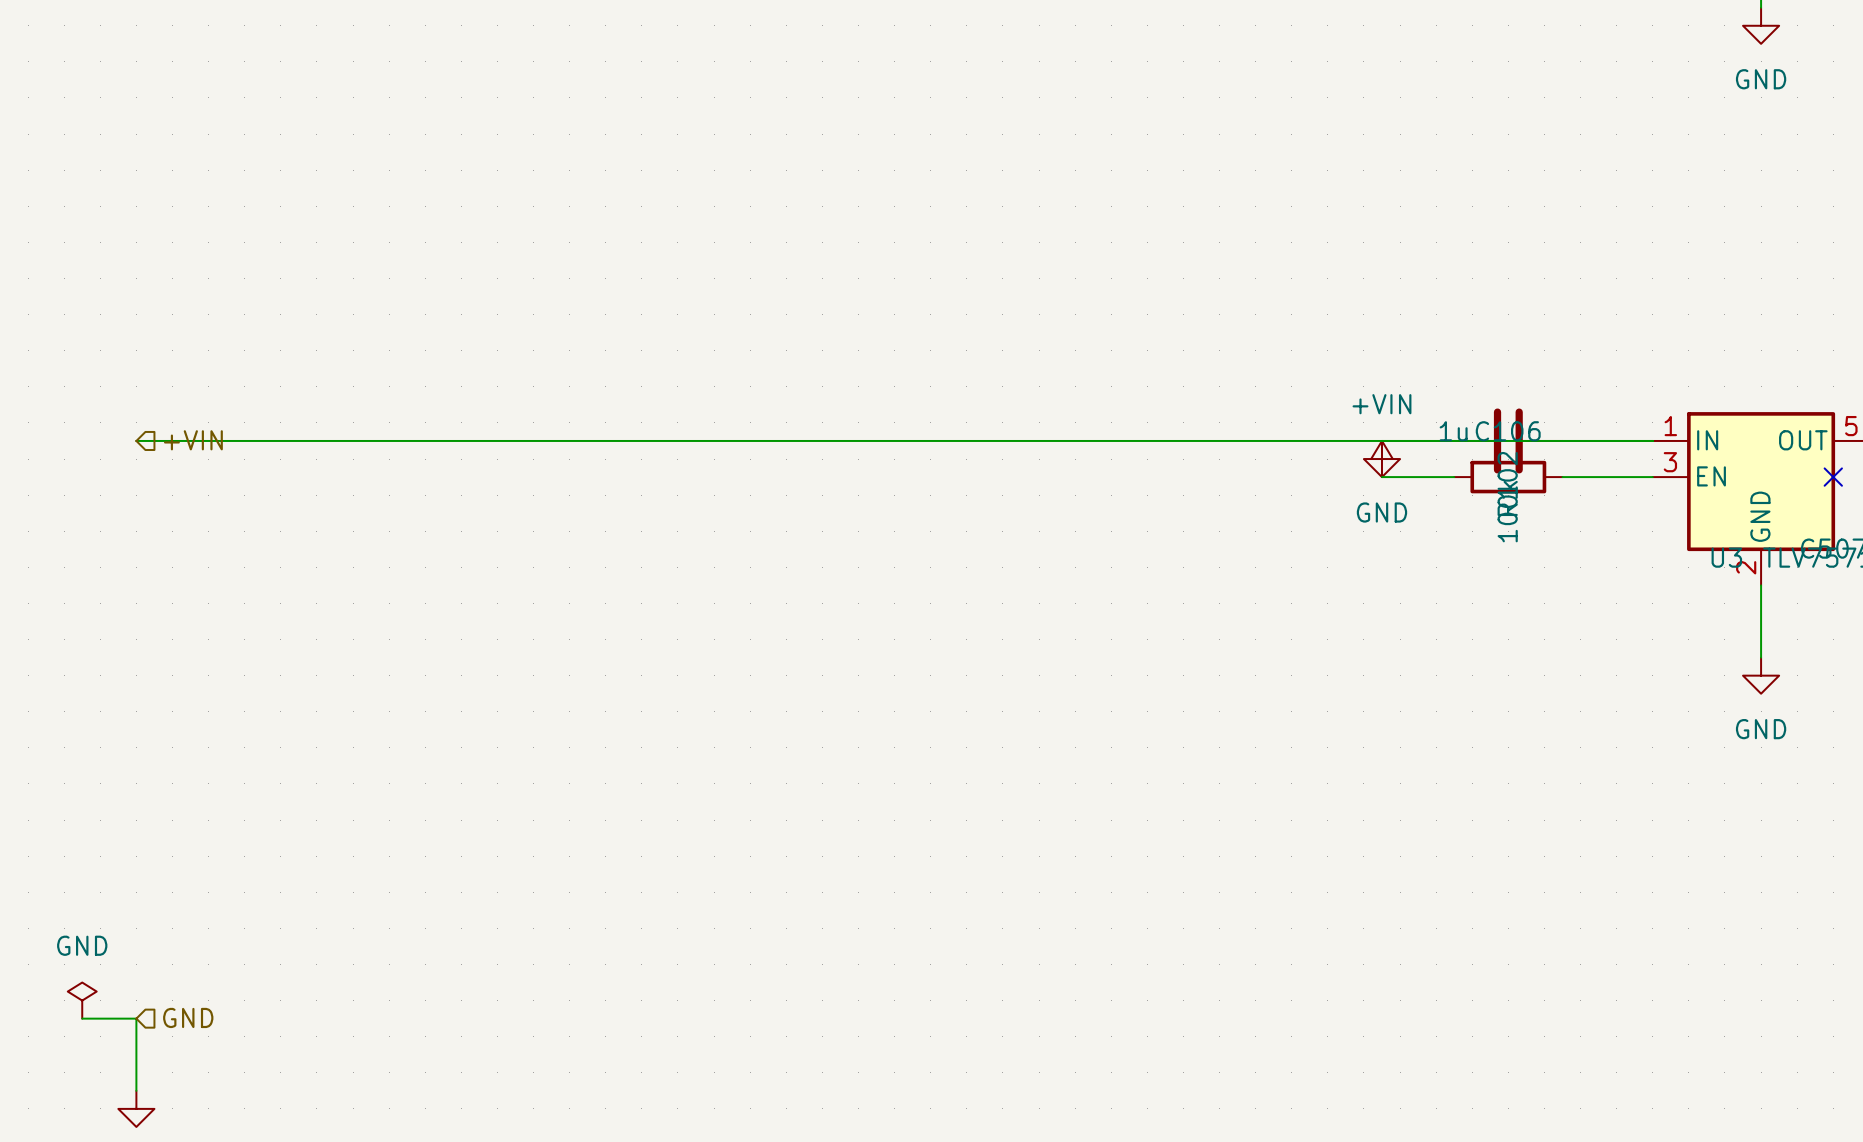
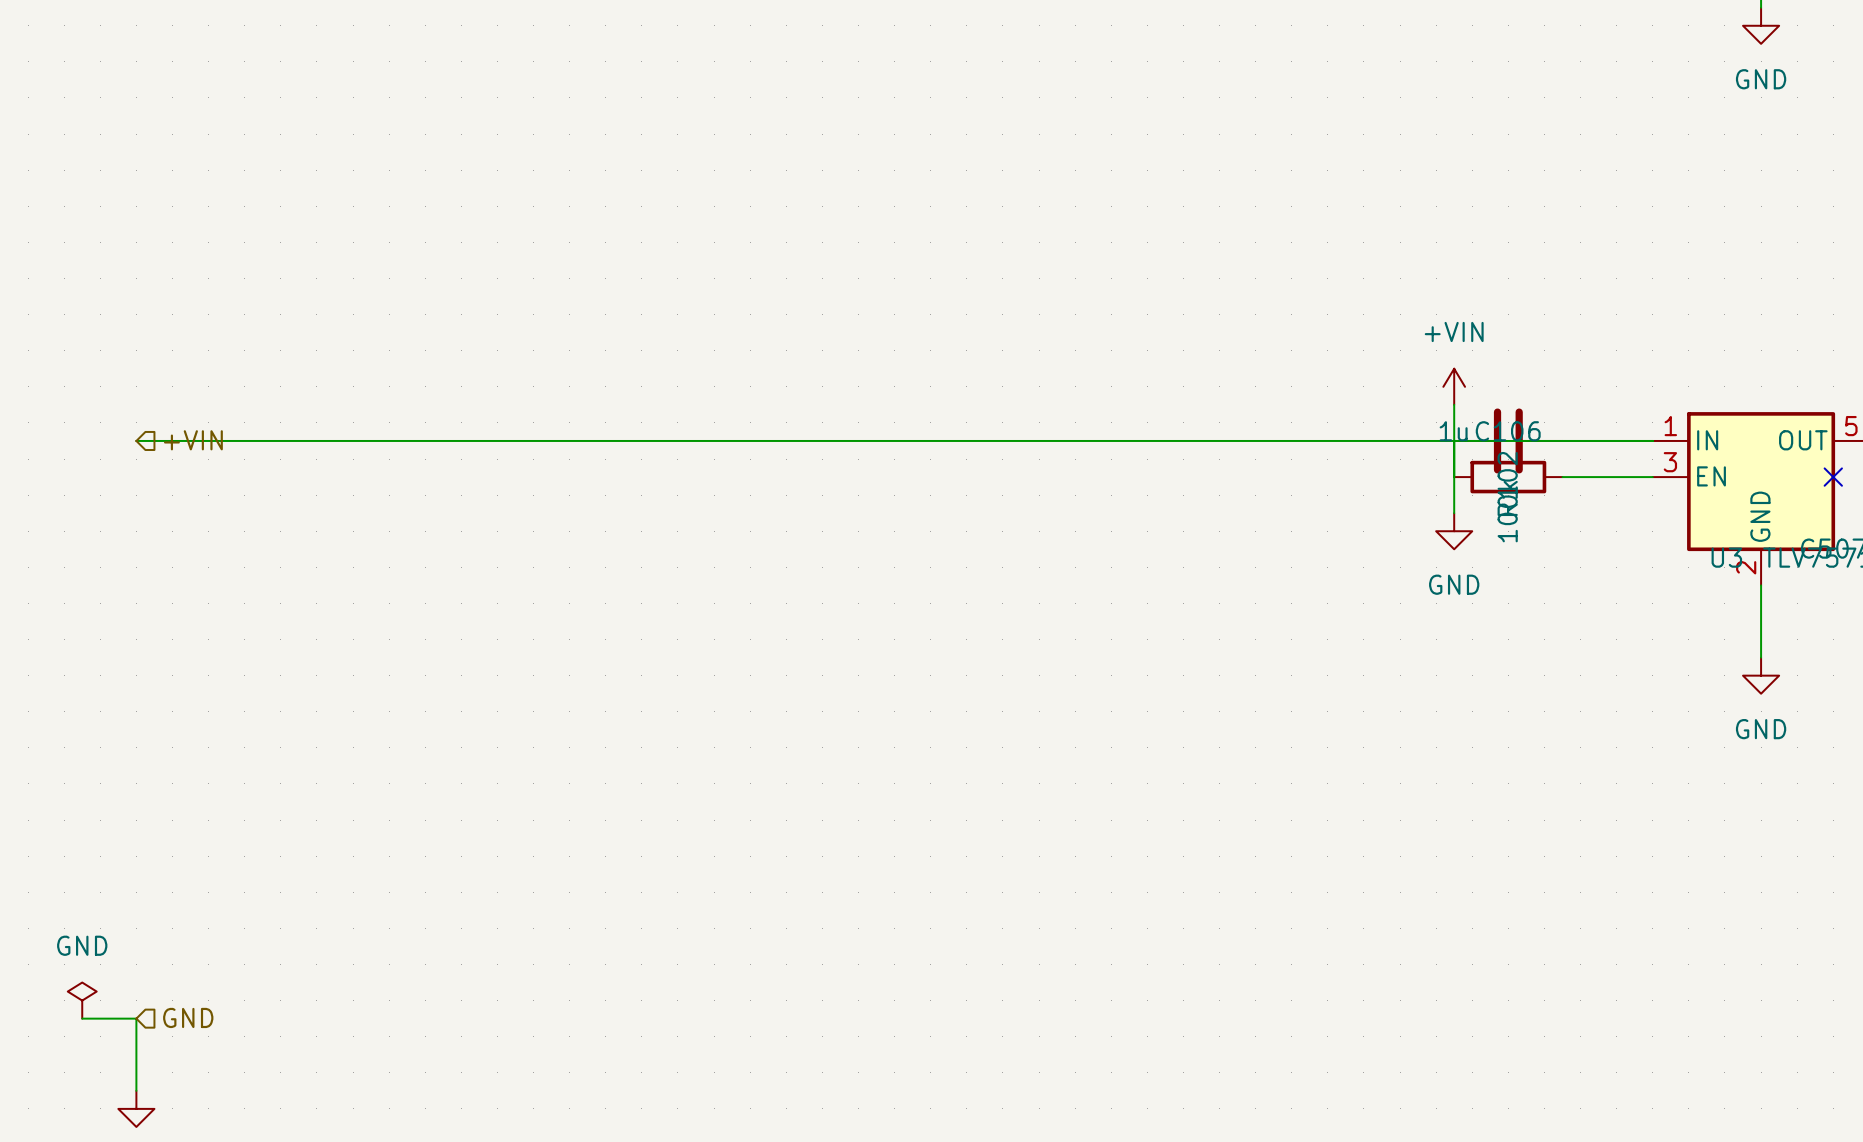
wire: none -> (1454, 404) (1454, 513)
power symbol position: GND (1381, 459) -> GND (1454, 531)
power symbol position: +VIN (1381, 459) -> +VIN (1454, 386)
wire: (1381, 477) (1454, 477) -> none

